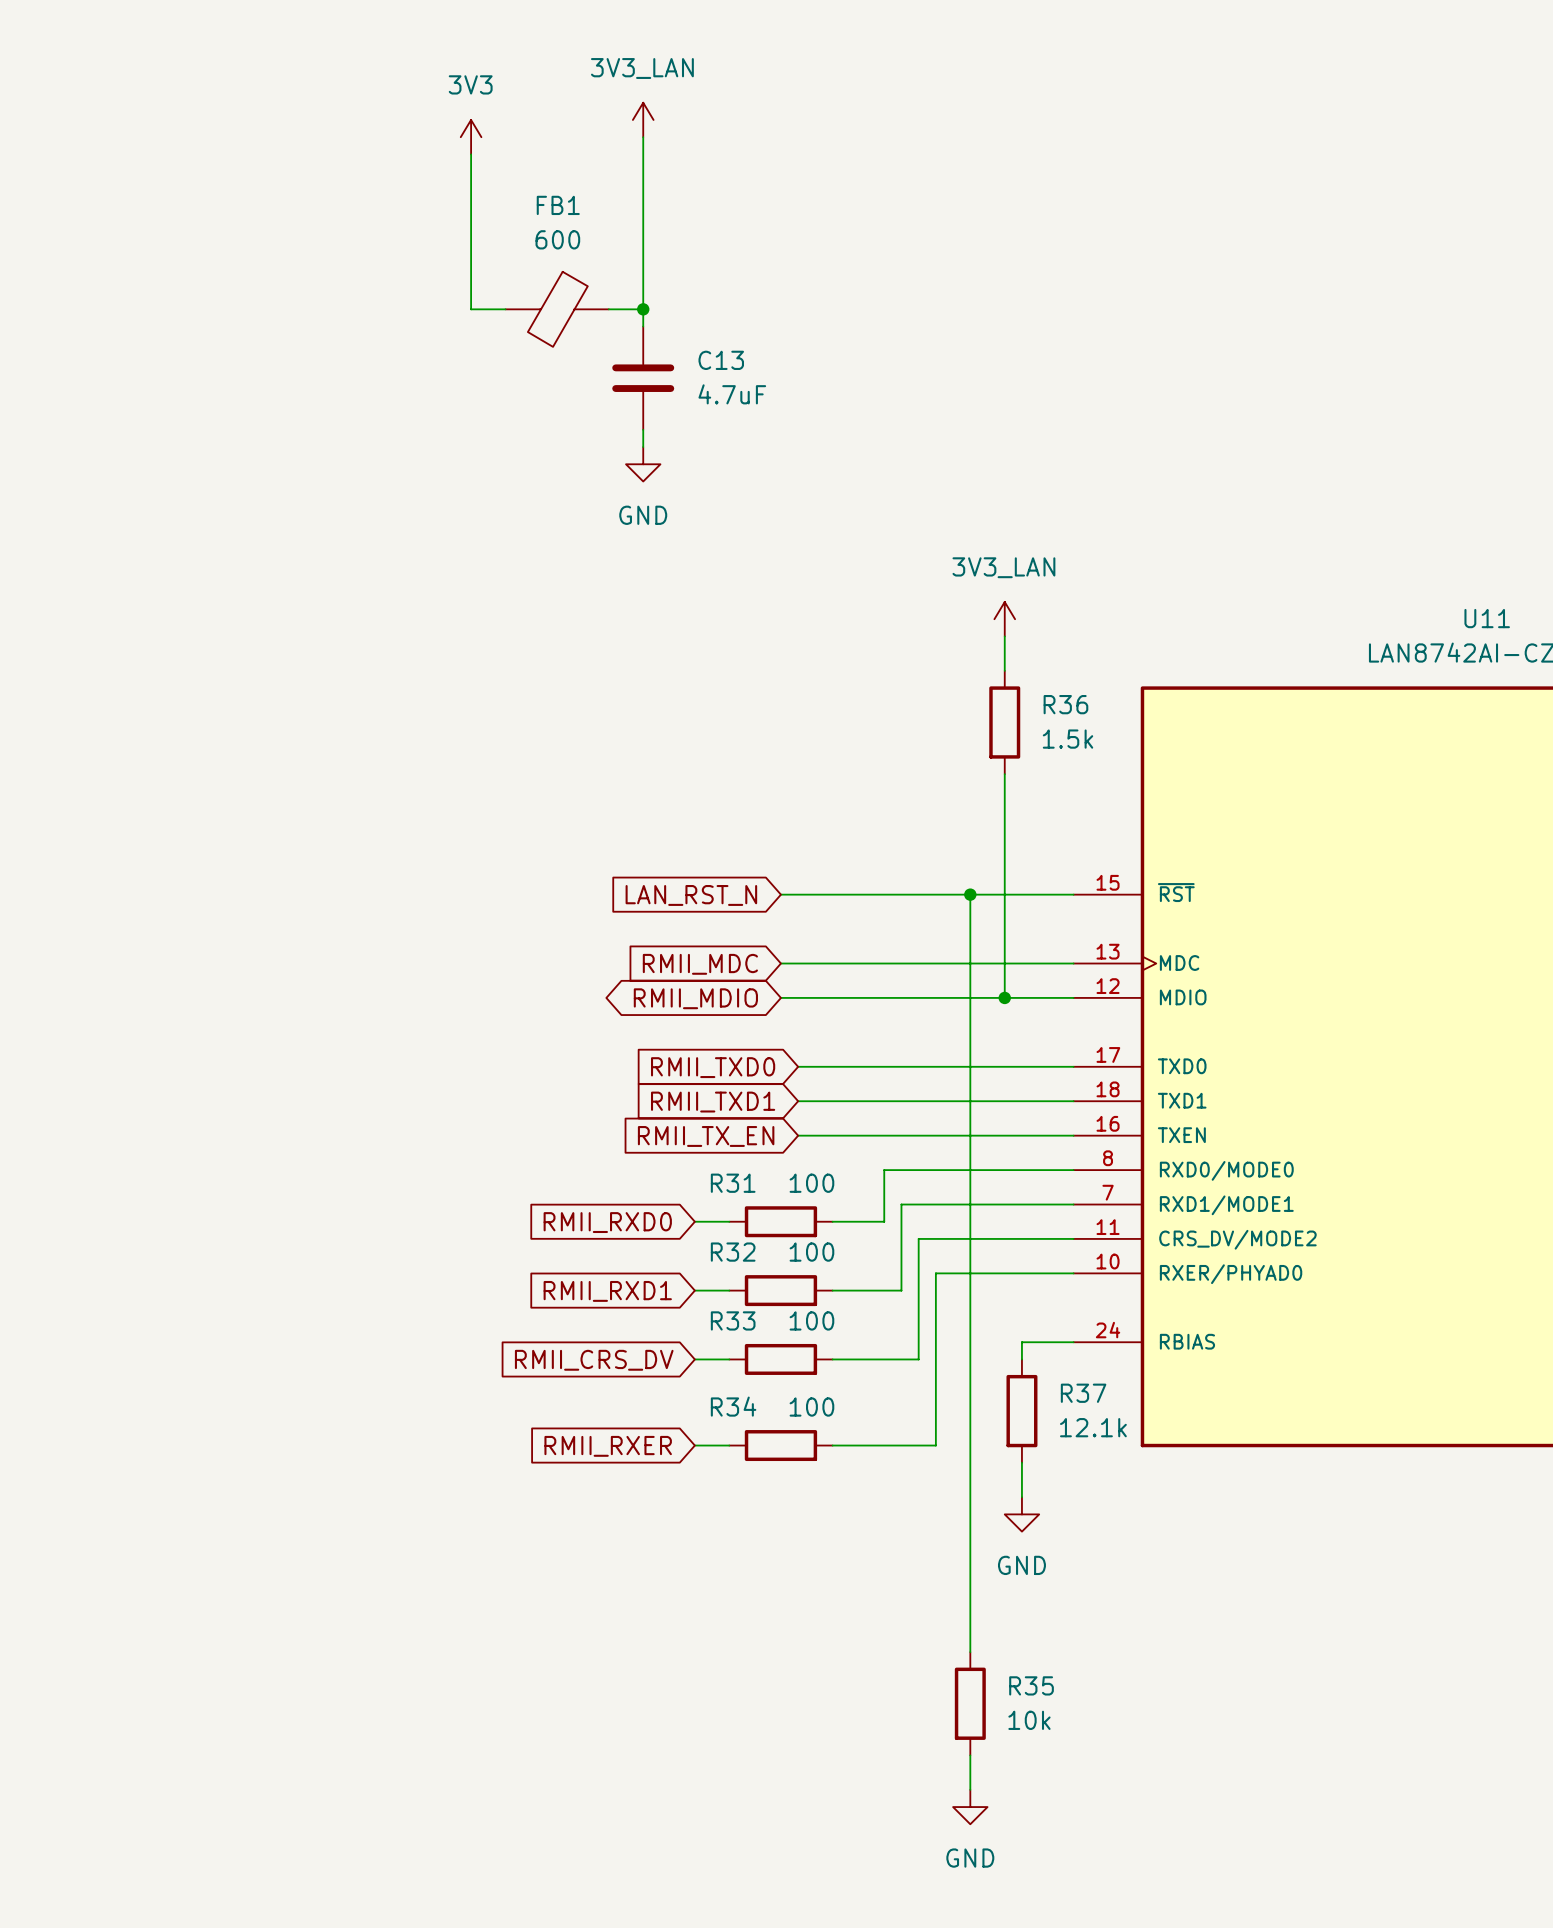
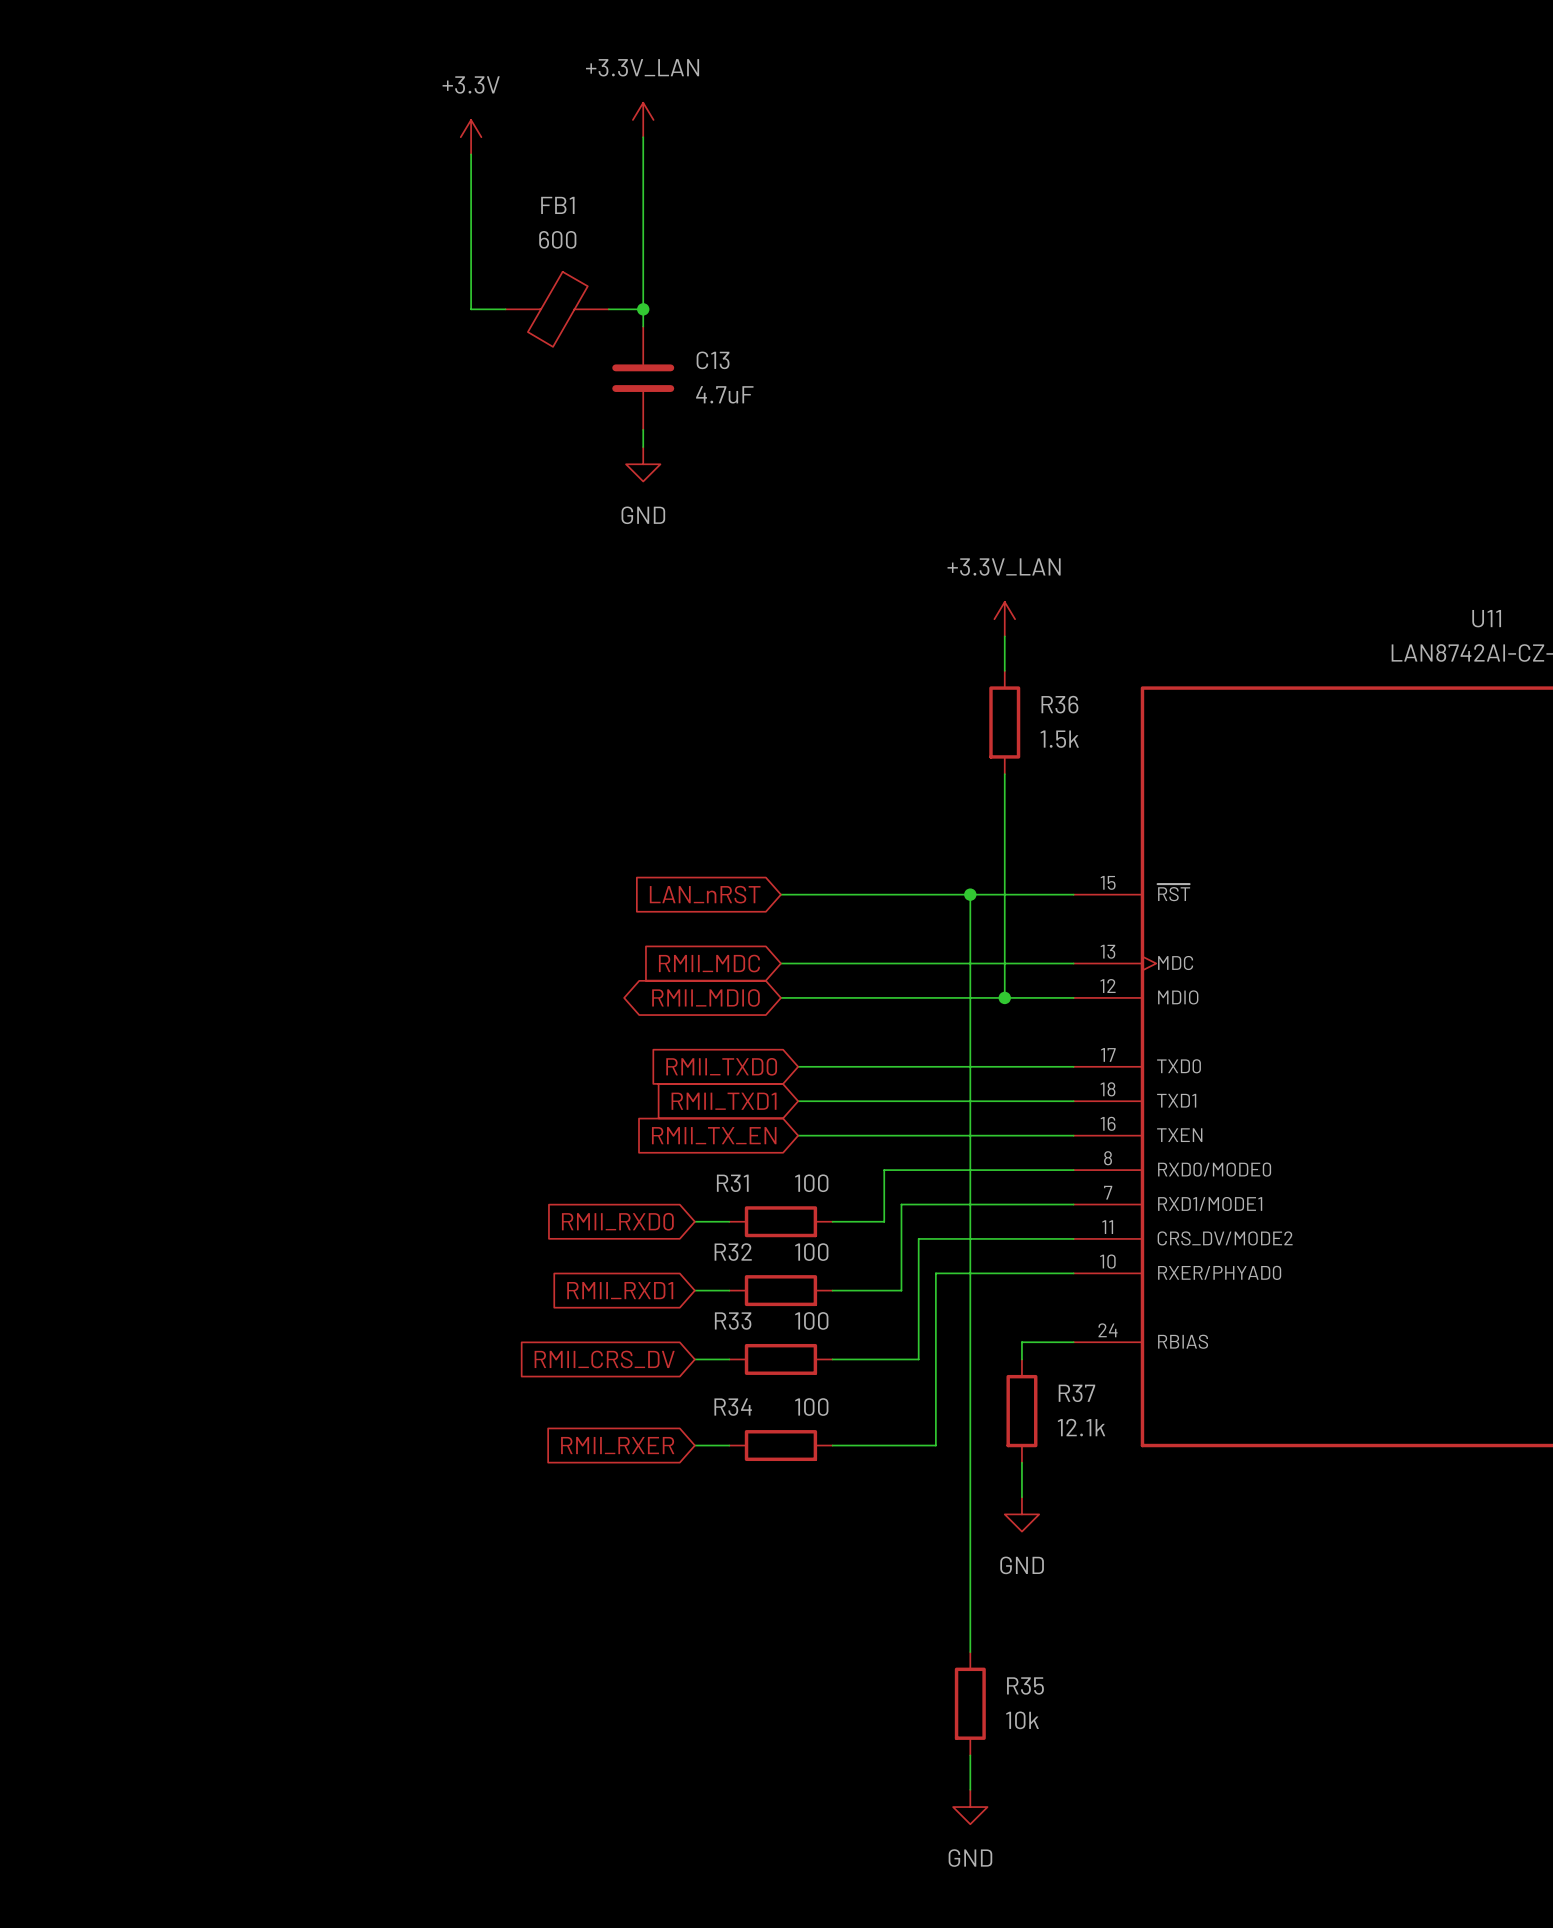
power symbol: 3V3_LAN (643, 119) -> +3.3V_LAN (643, 119)
power symbol: 3V3 (471, 137) -> +3.3V (471, 137)
power symbol: 3V3_LAN (1004, 619) -> +3.3V_LAN (1004, 619)
global label: LAN_RST_N (691, 895) -> LAN_nRST (705, 894)

